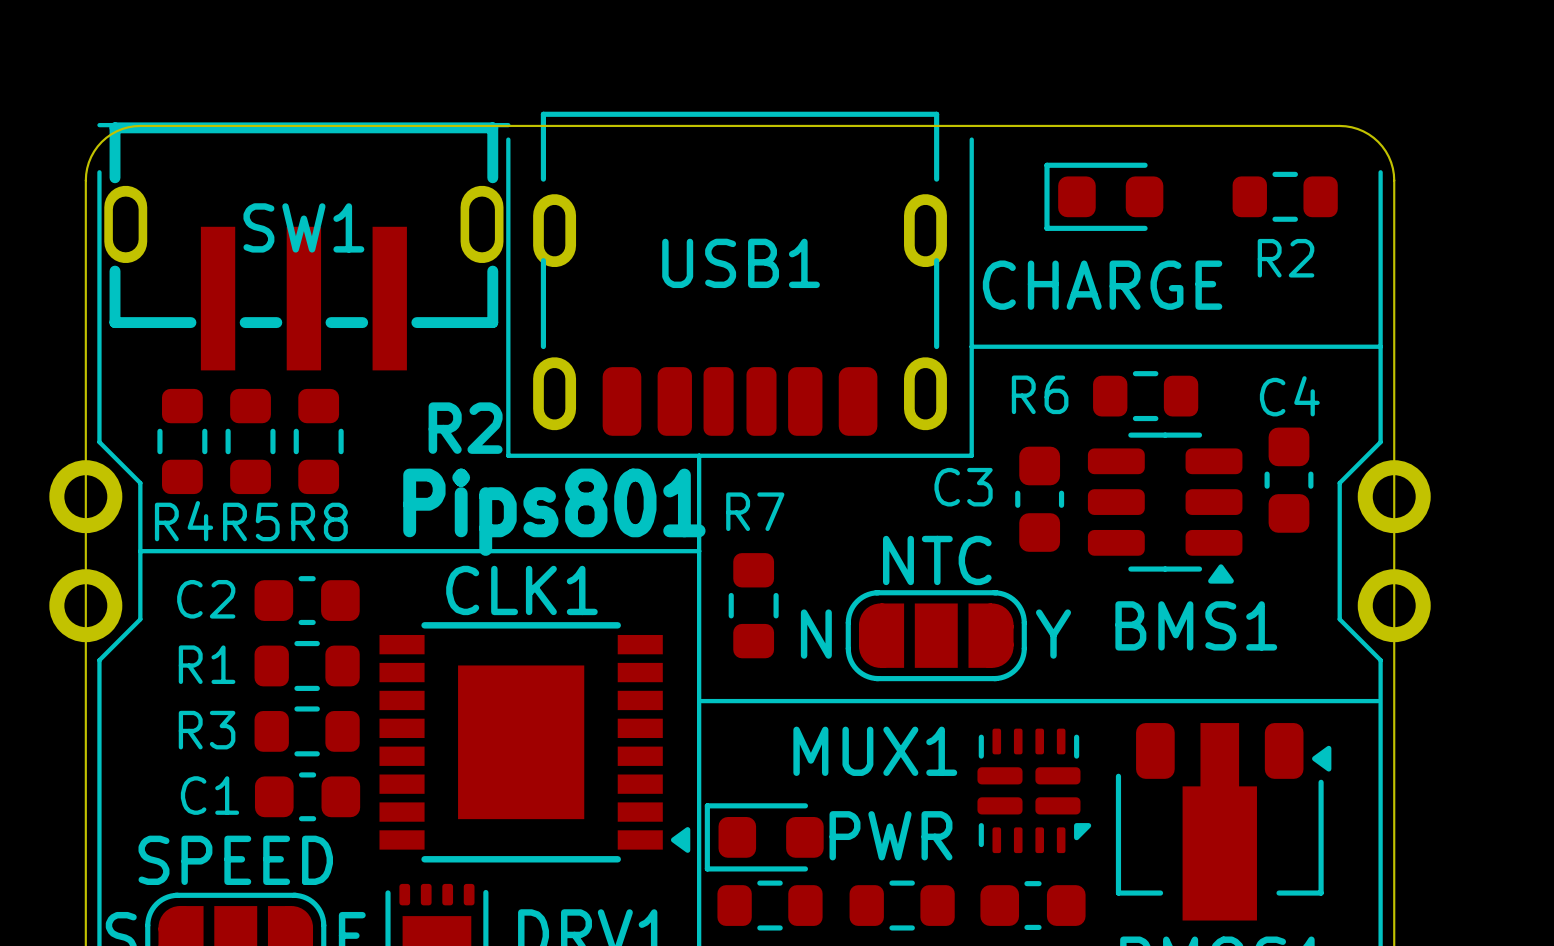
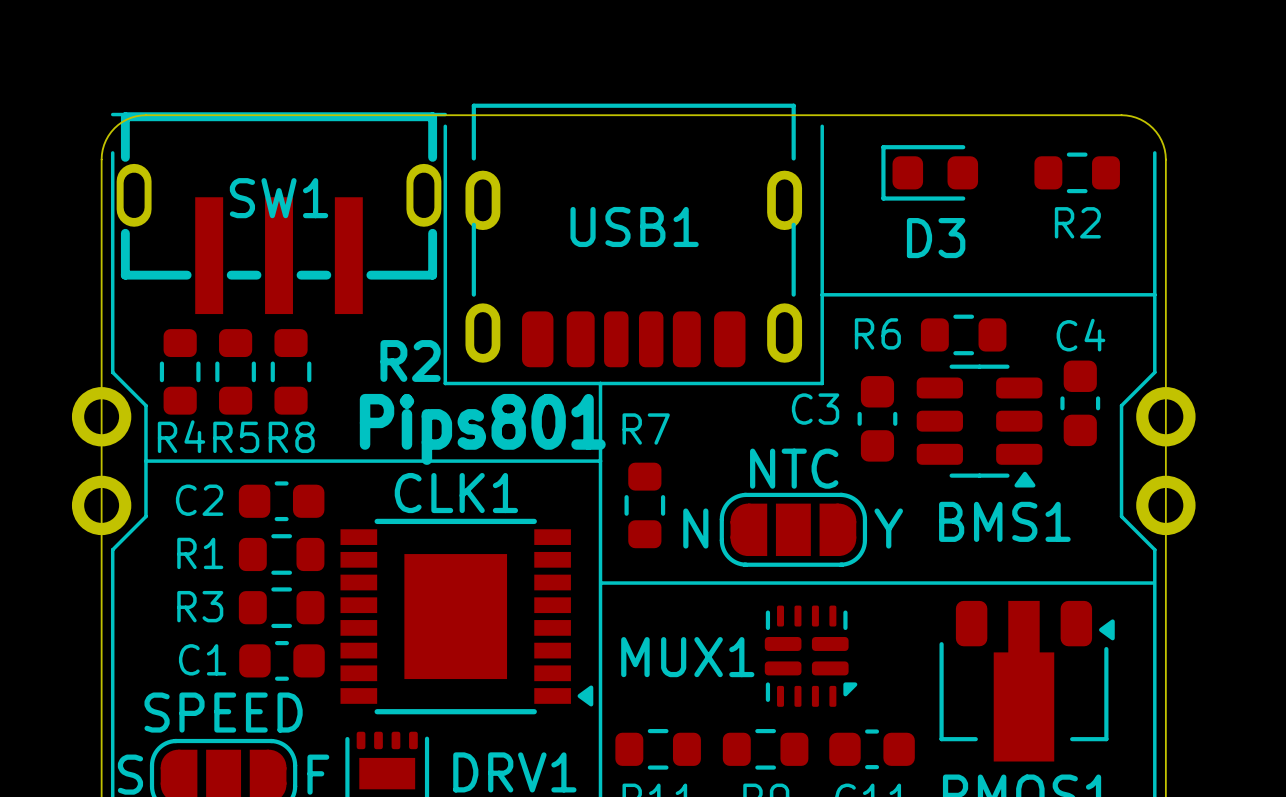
CHARGE name: CHARGE (1102, 285) -> D3 (936, 238)
MUX1 name position: MUX1 (875, 751) -> MUX1 (687, 657)
MUX1 position: (1034, 790) -> (811, 656)
PWR: (764, 837) -> none

